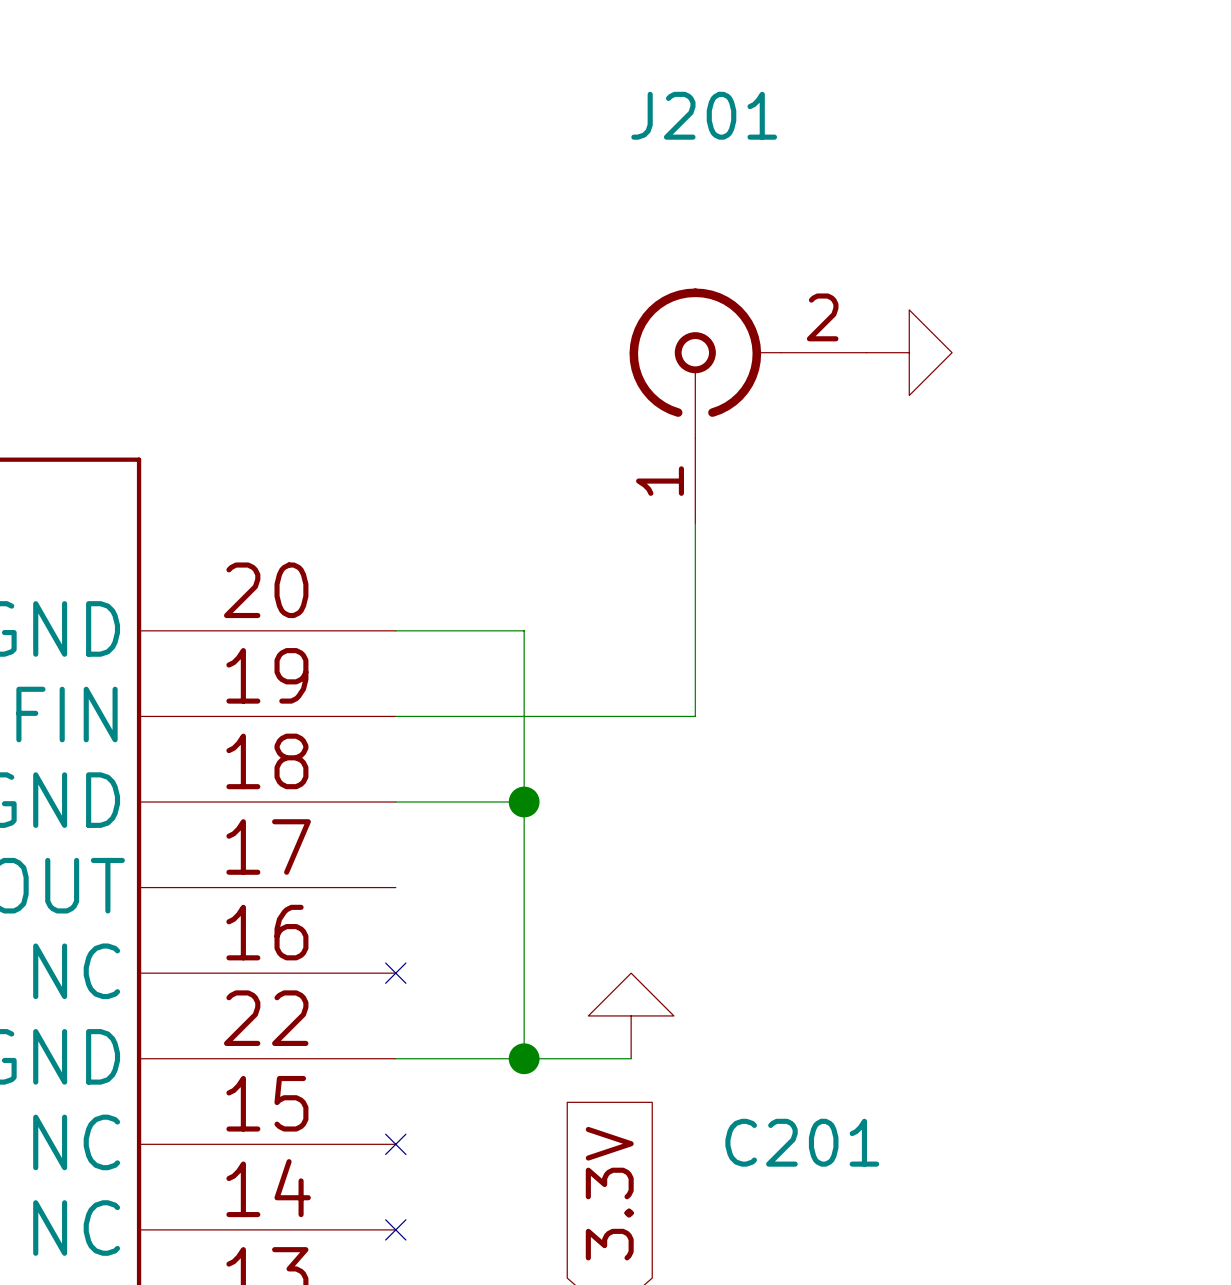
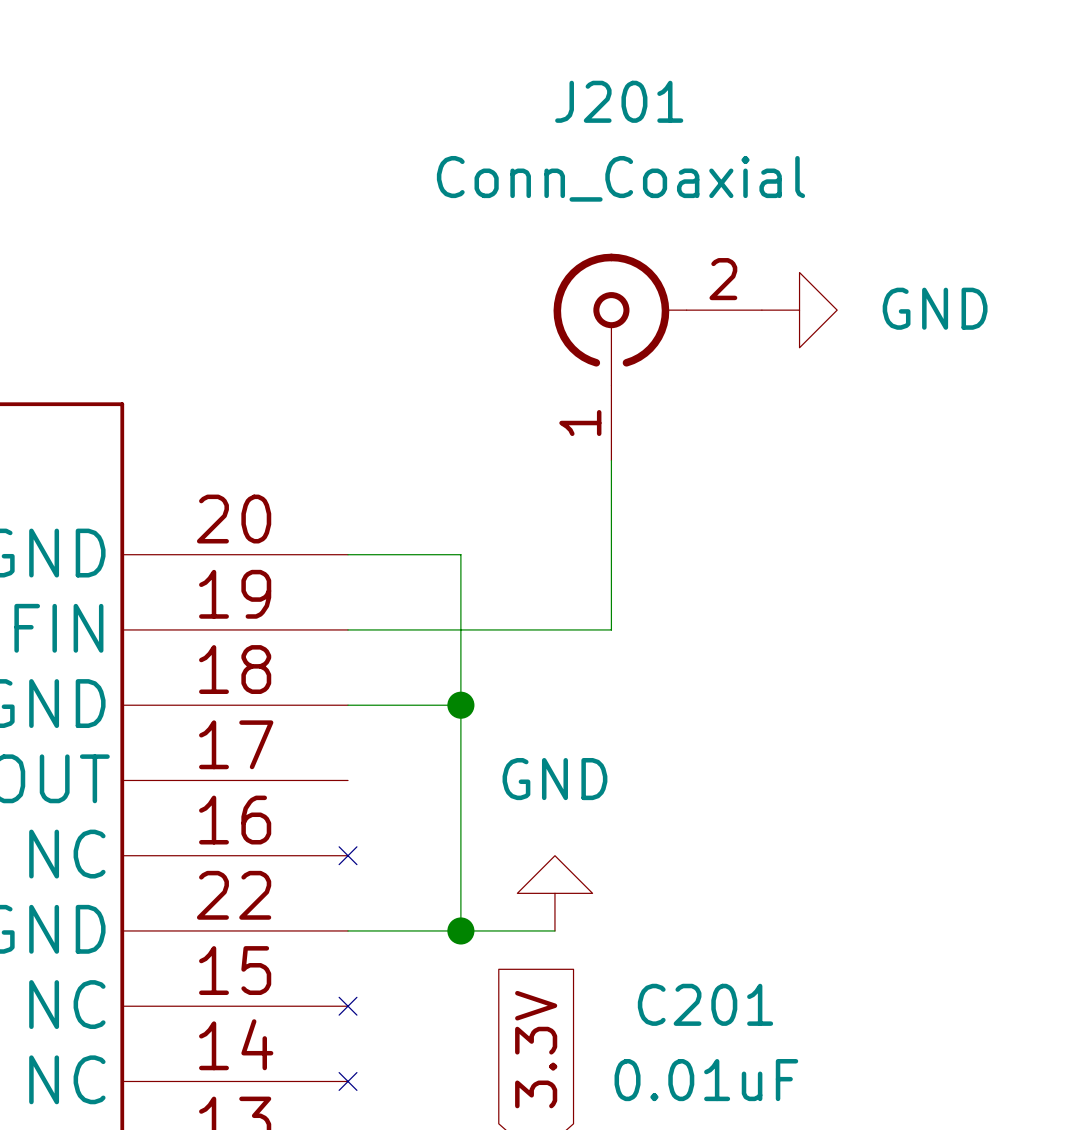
J201 value: none -> Conn_Coaxial (620, 178)
power symbol text: none -> GND (935, 308)
power symbol text: none -> GND (554, 779)
C201 value: none -> 0.01uF (706, 1080)

